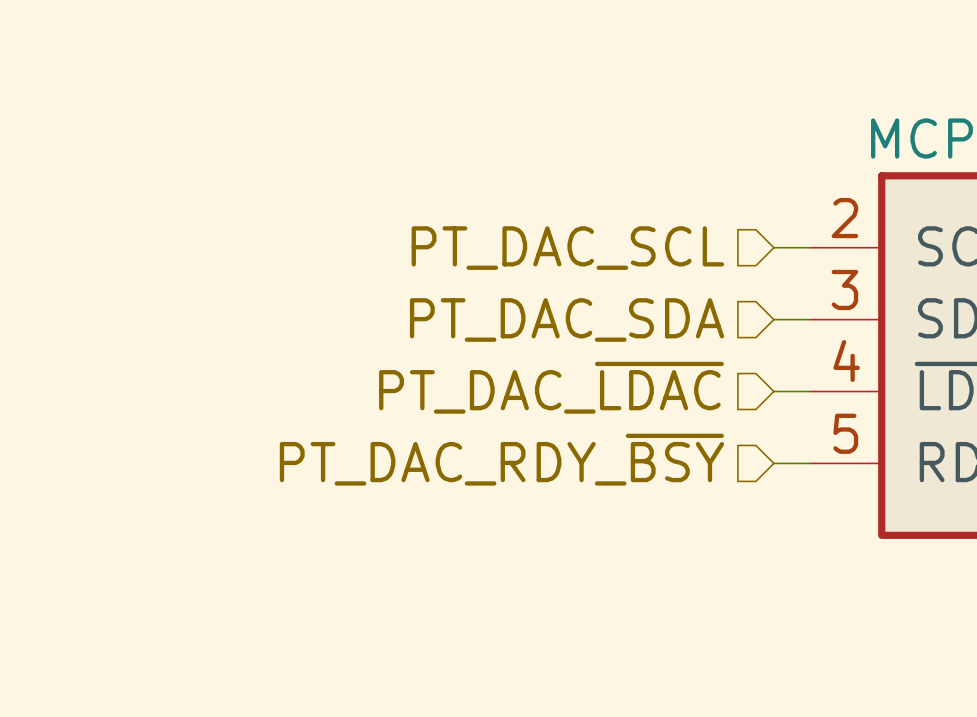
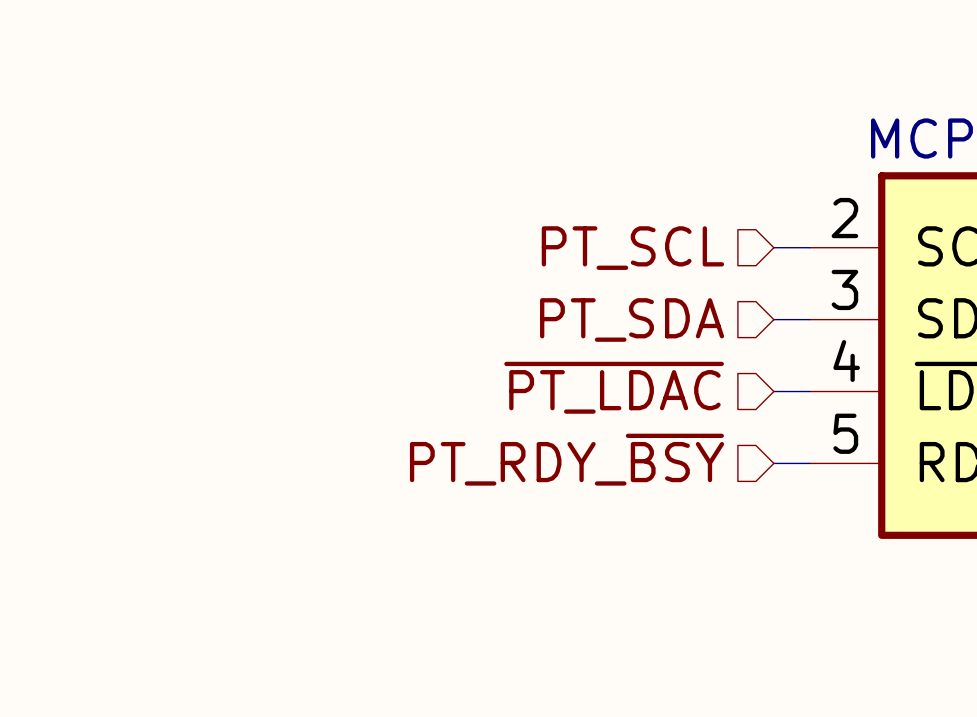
hierarchical label: PT_DAC_SCL (567, 248) -> PT_SCL (632, 248)
hierarchical label: PT_DAC_SDA (567, 319) -> PT_SDA (632, 319)
hierarchical label: PT_DAC_~{LDAC} (551, 387) -> ~{PT_LDAC} (614, 387)
hierarchical label: PT_DAC_RDY_~{BSY} (501, 459) -> PT_RDY_~{BSY} (567, 459)

